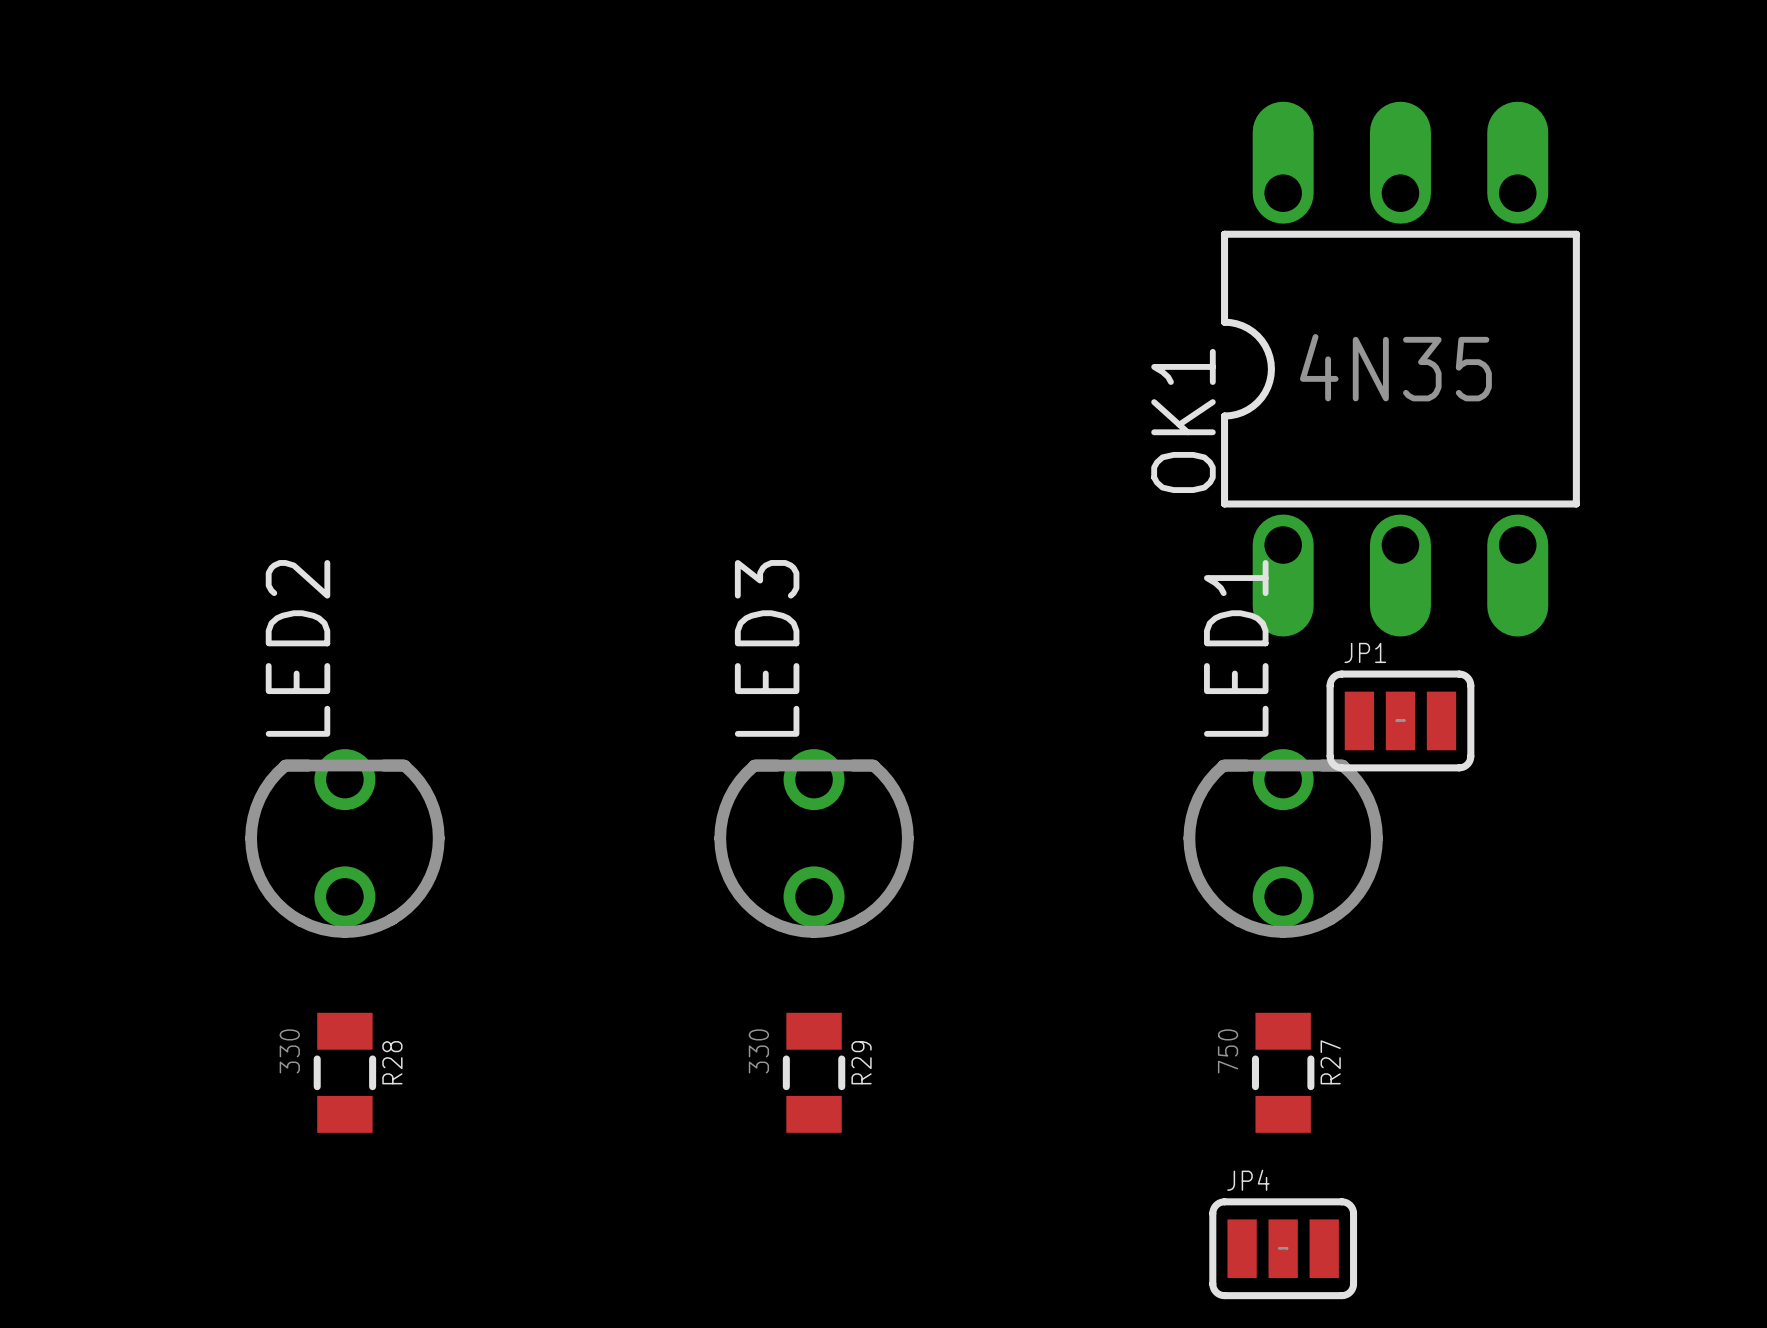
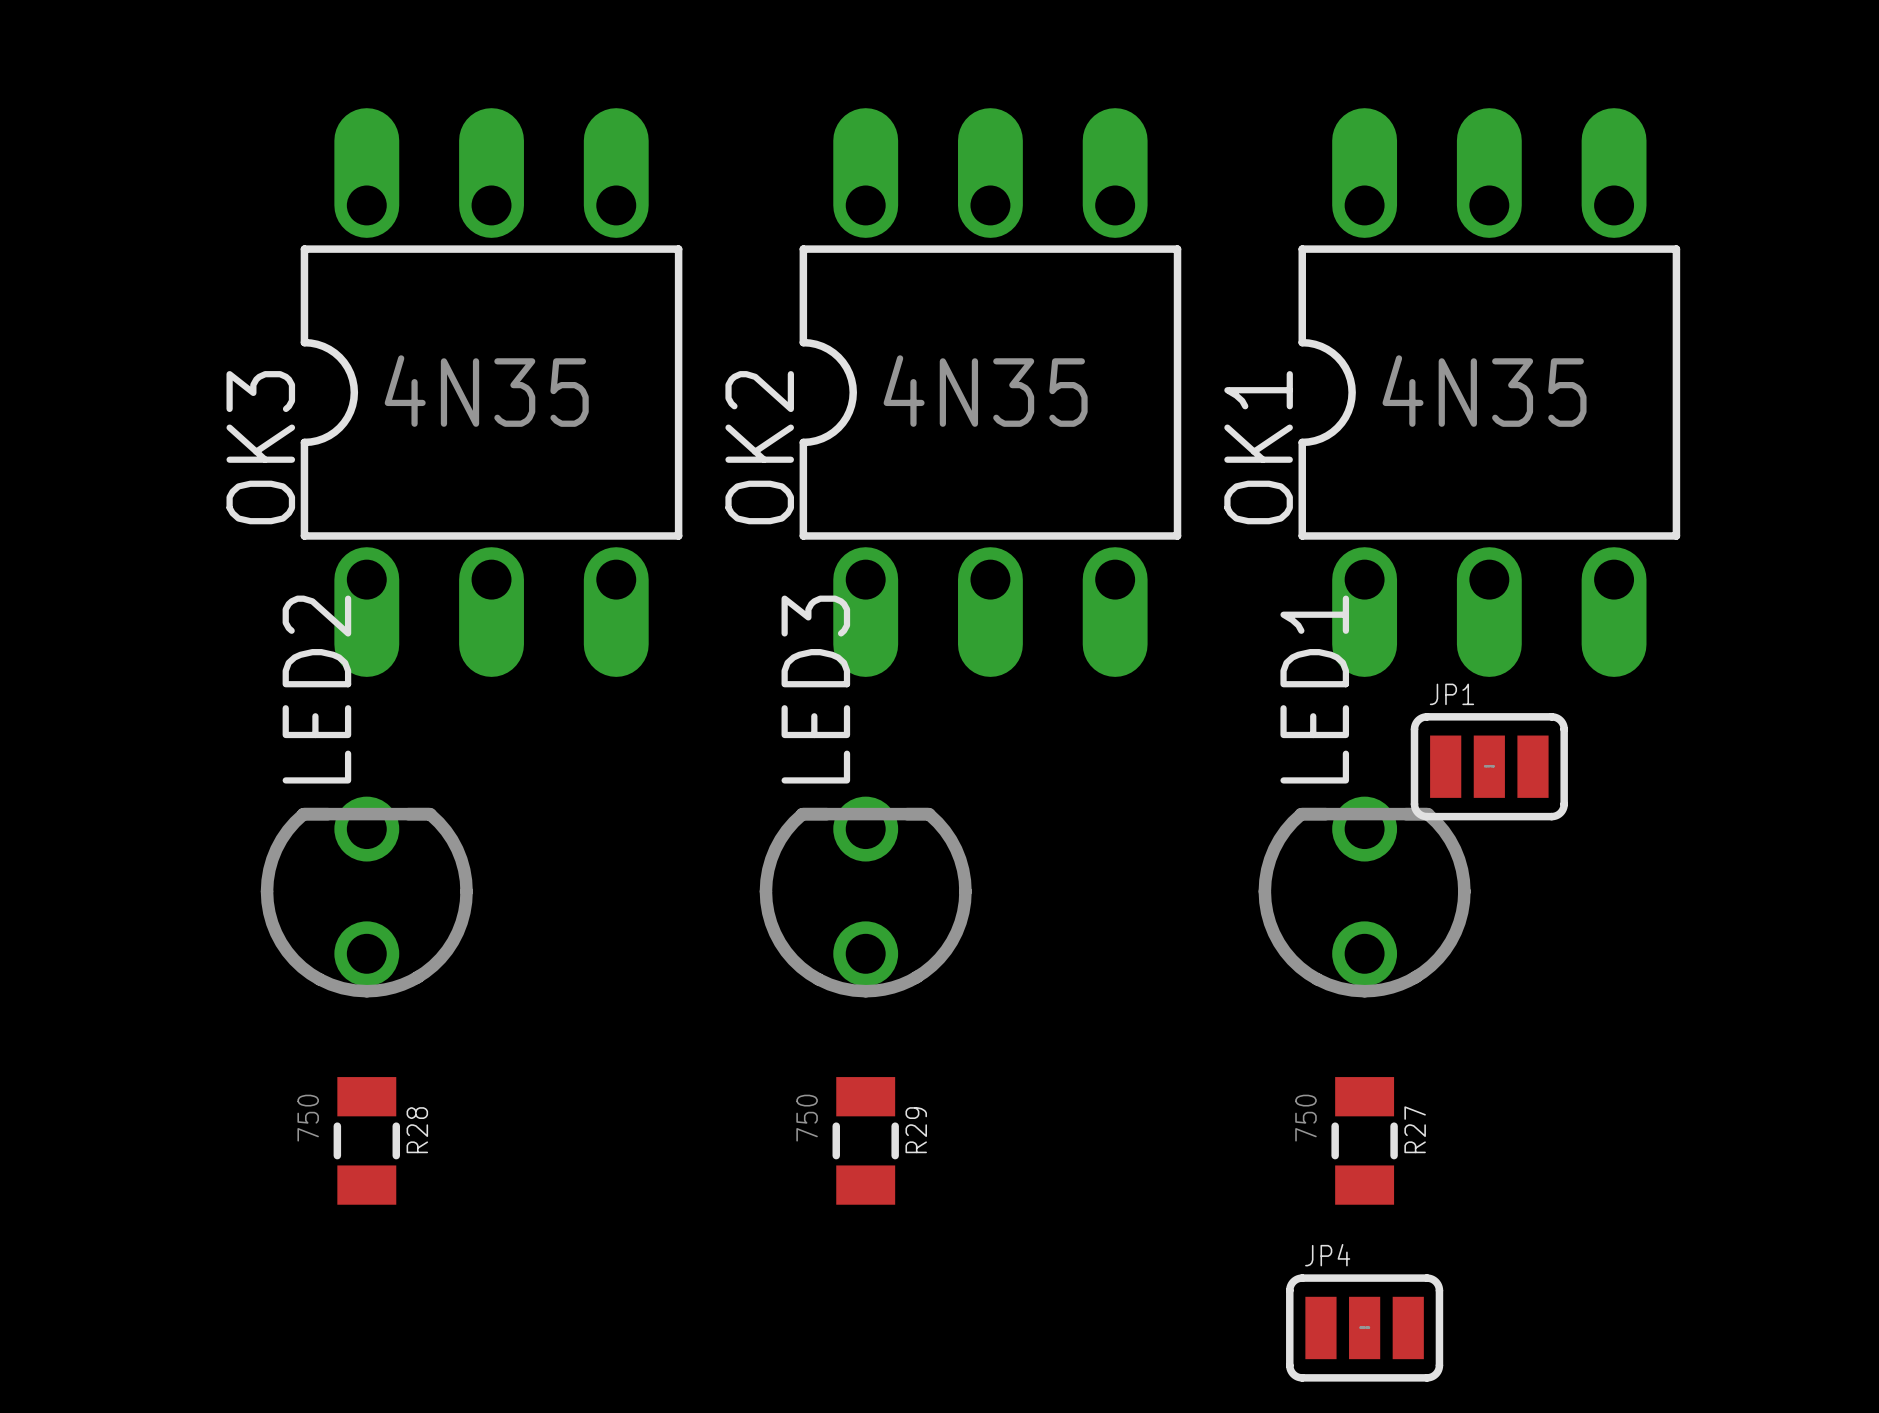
OK3: none -> 4N35 (491, 392)
OK2: none -> 4N35 (990, 392)
R28 value: 330 (289, 1051) -> 750 (308, 1118)
R29 value: 330 (758, 1051) -> 750 (807, 1118)

